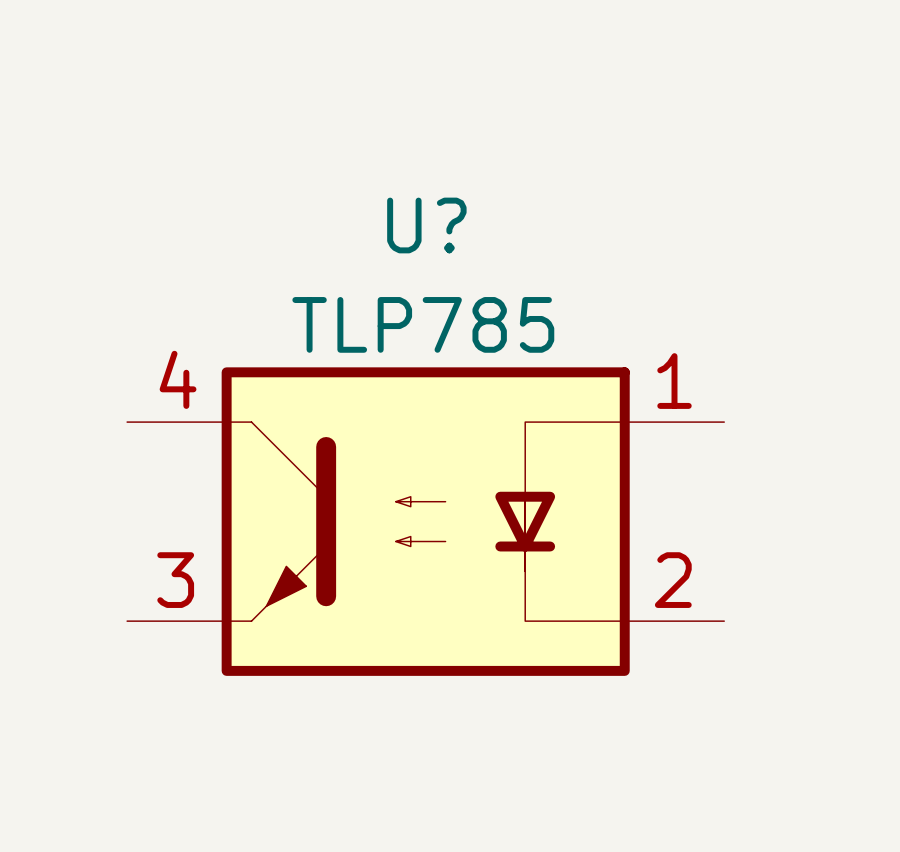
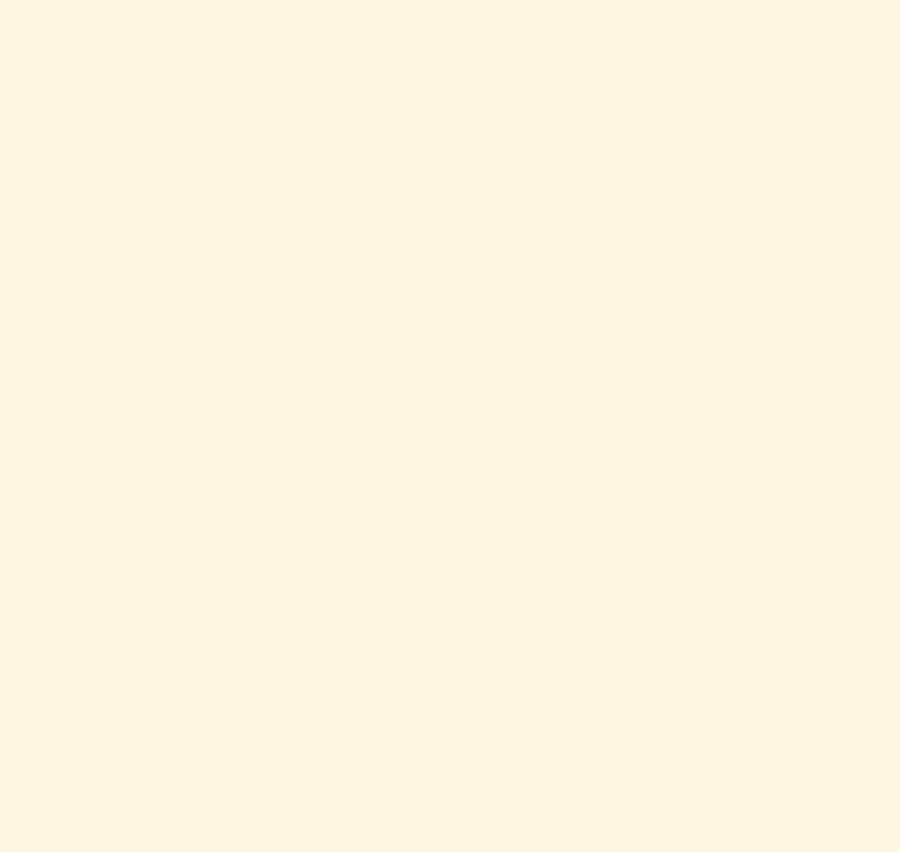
U?: TLP785 (425, 521) -> none

